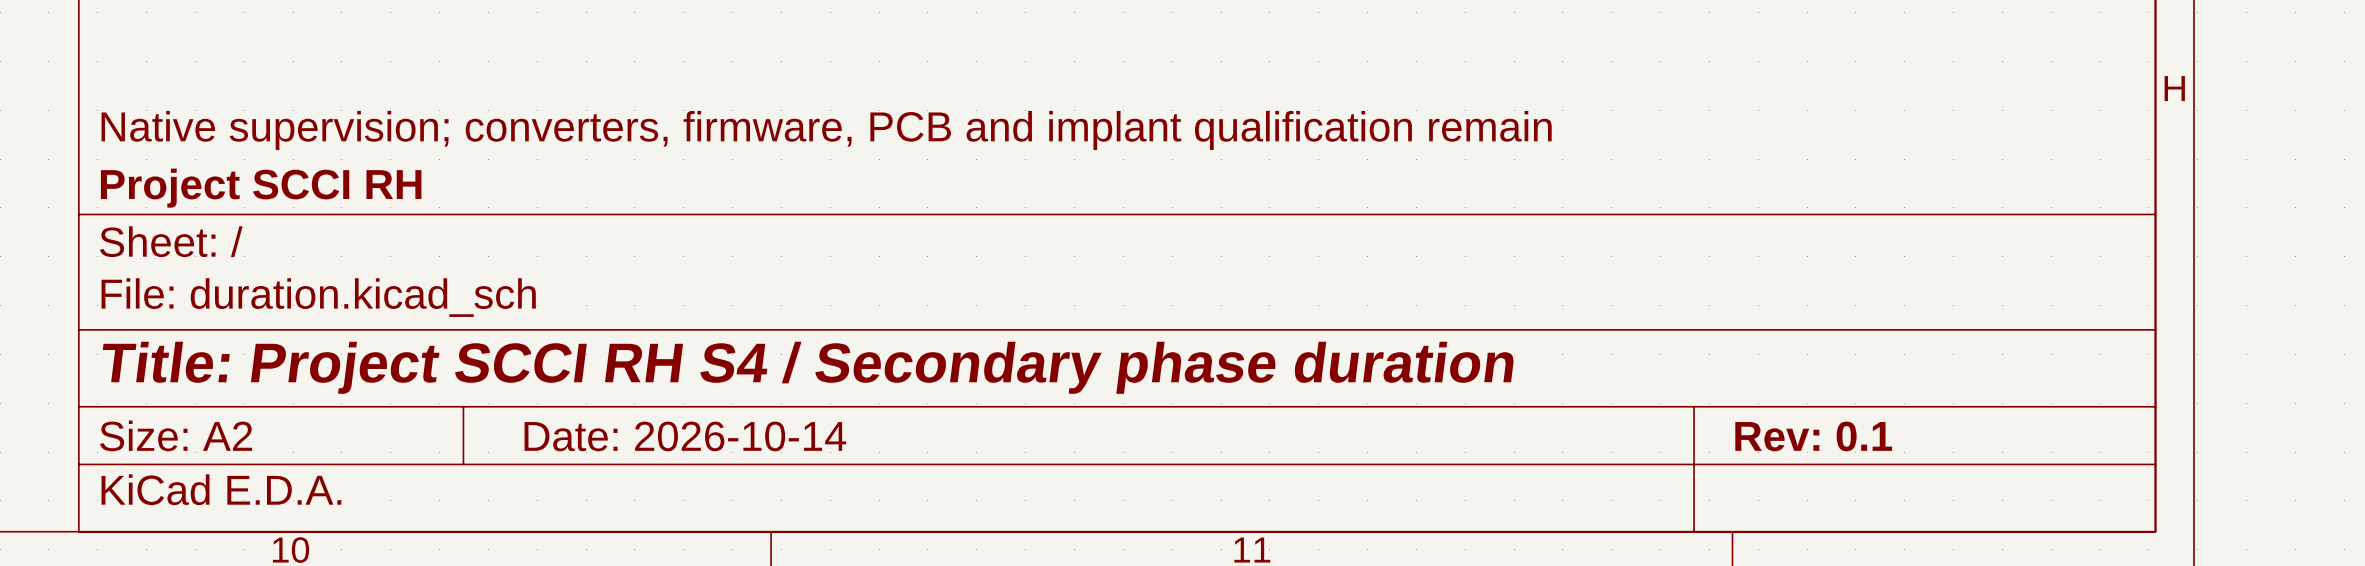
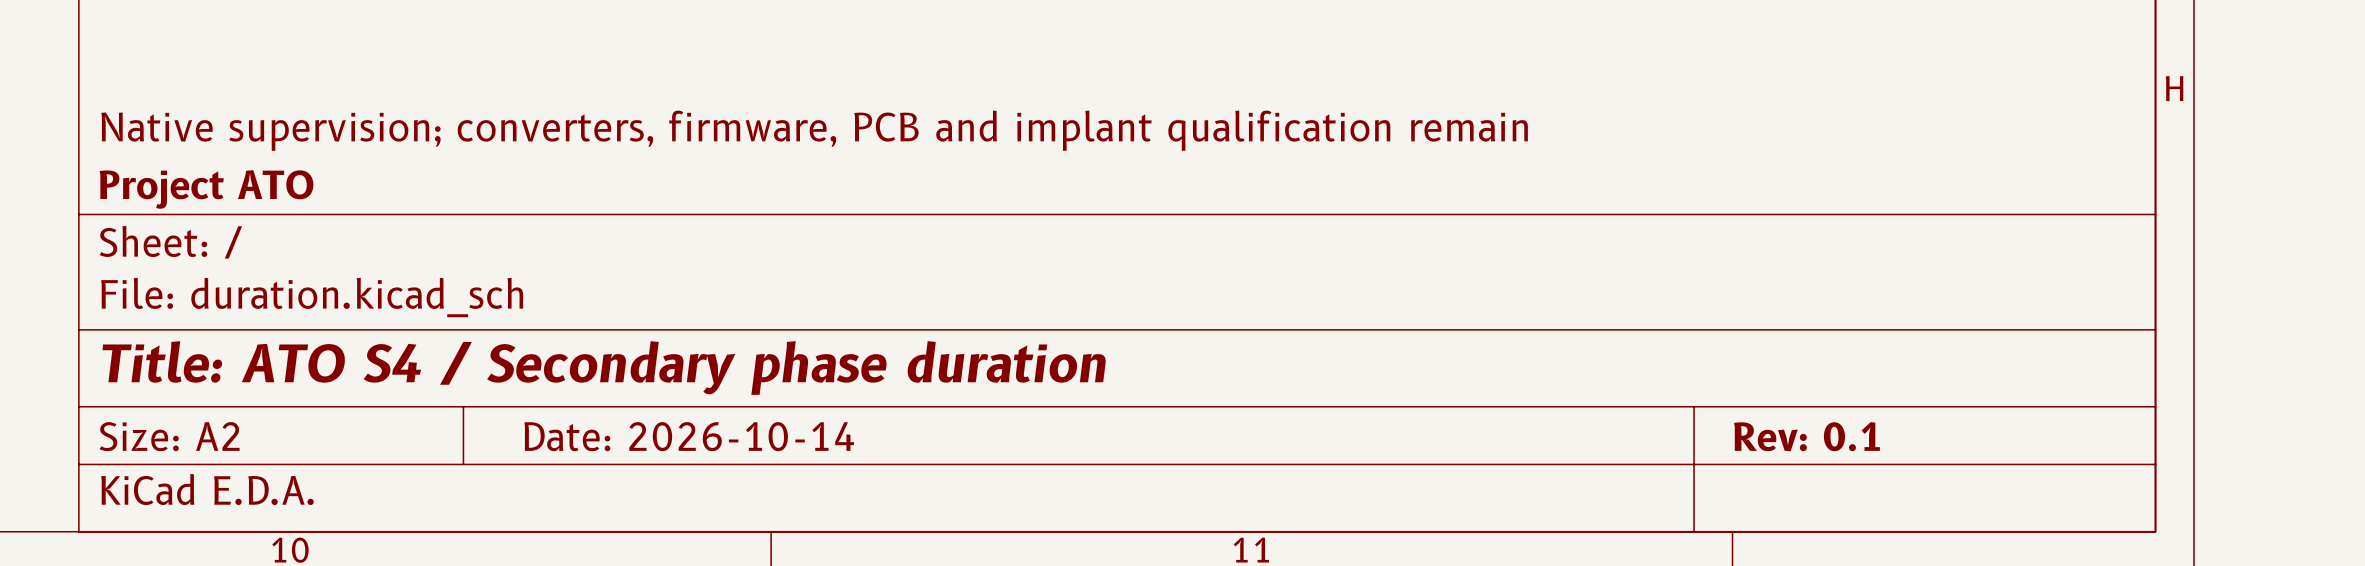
title block: Project SCCI RH (261, 188) -> Project ATO (206, 189)
title block: Title: Project SCCI RH S4 / Secondary phase duration (808, 367) -> Title: ATO S4 / Secondary phase duration (604, 368)

